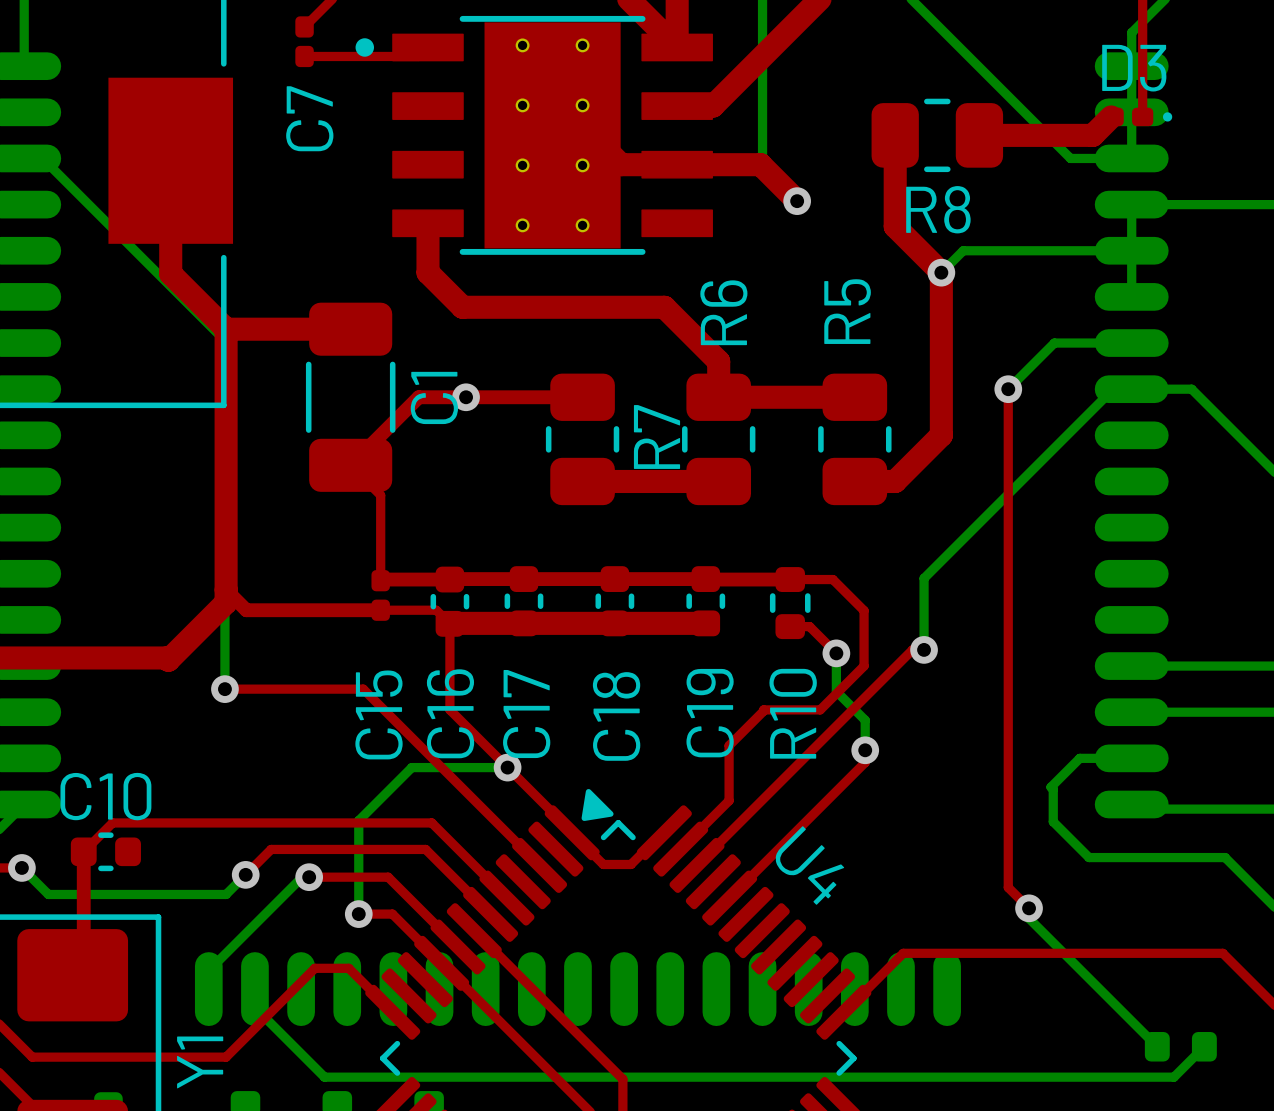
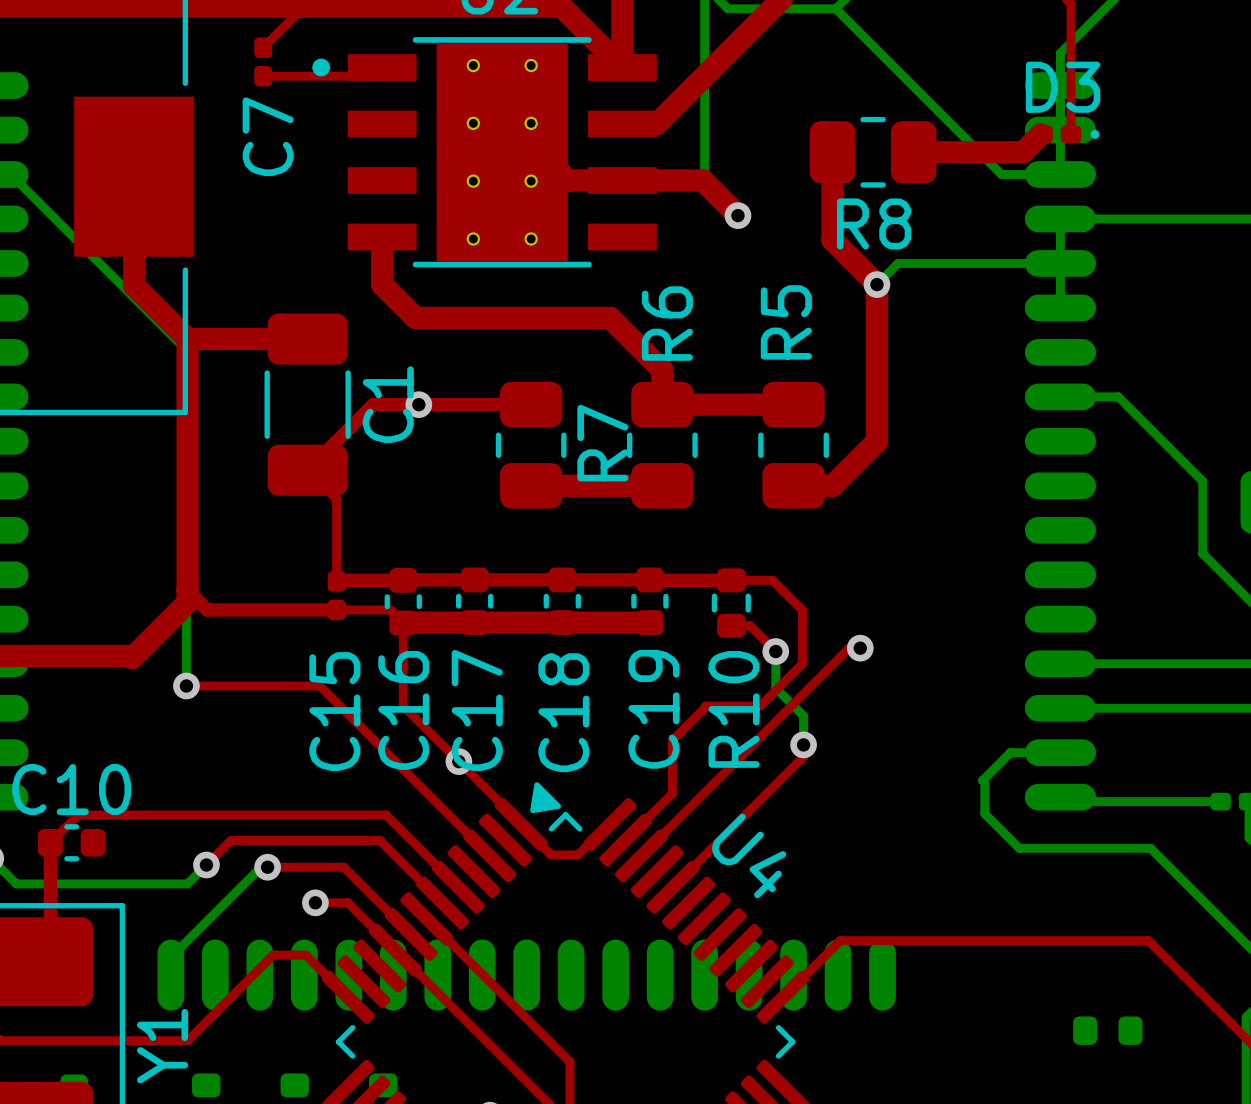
bottom track: (1131, 343) (1054, 343) (1008, 389) -> none
top track: (1008, 389) (1008, 887) (1029, 908) -> none
via: (1008, 389) -> none
bottom track: (1131, 389) (1113, 389) (924, 578) (924, 649) -> none
bottom track: (507, 767) (411, 767) (358, 820) (358, 914) -> none
bottom track: (1029, 908) (1029, 918) (1157, 1046) -> none
via: (1029, 908) -> none
bottom track: (254, 989) (254, 1007) (324, 1077) (1173, 1077) (1204, 1046) -> none

